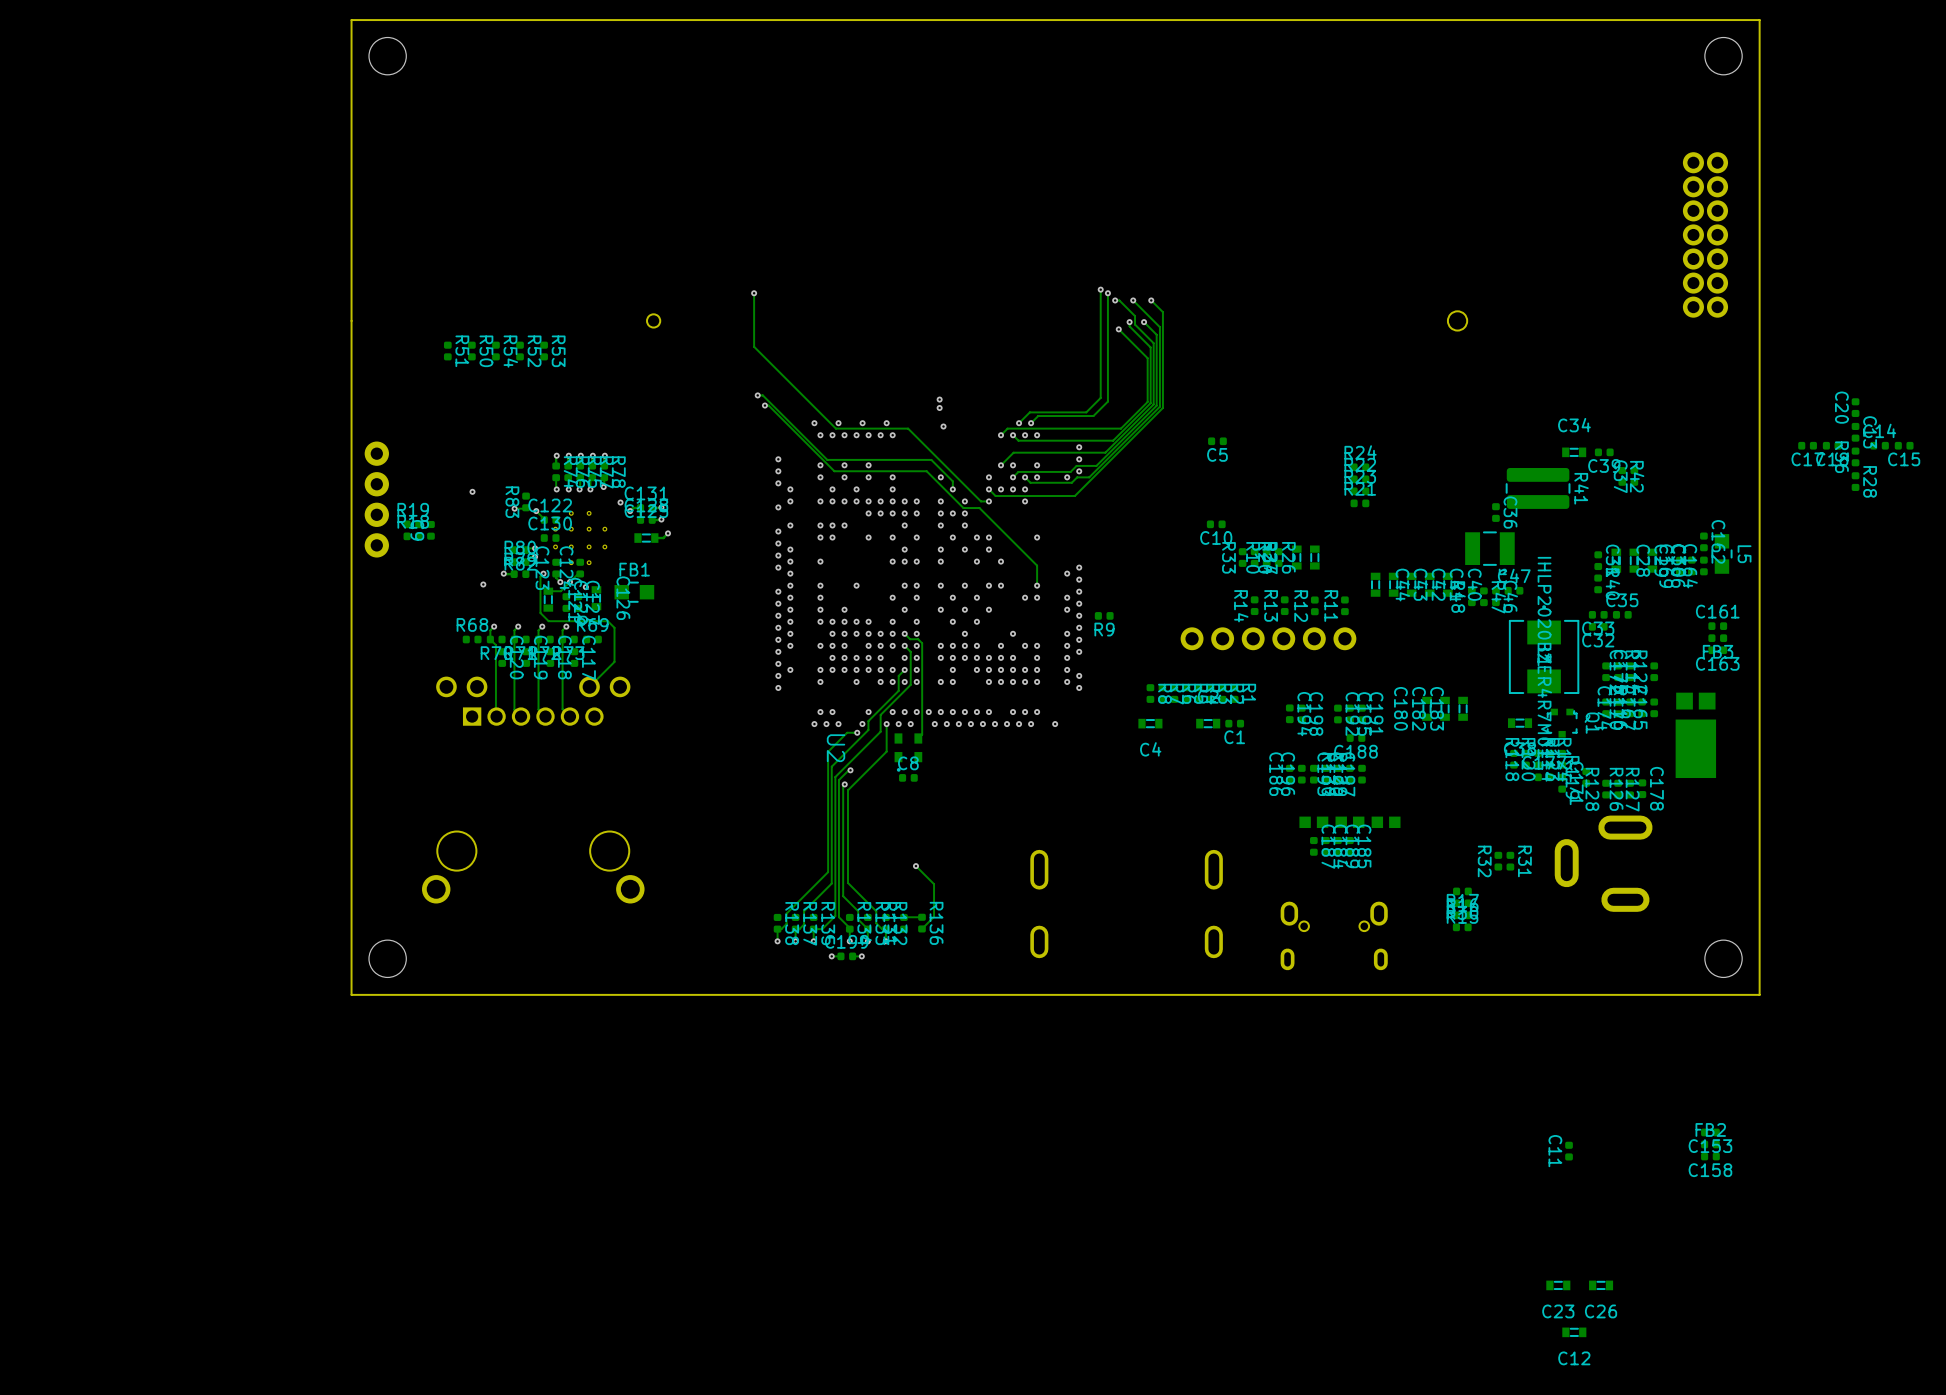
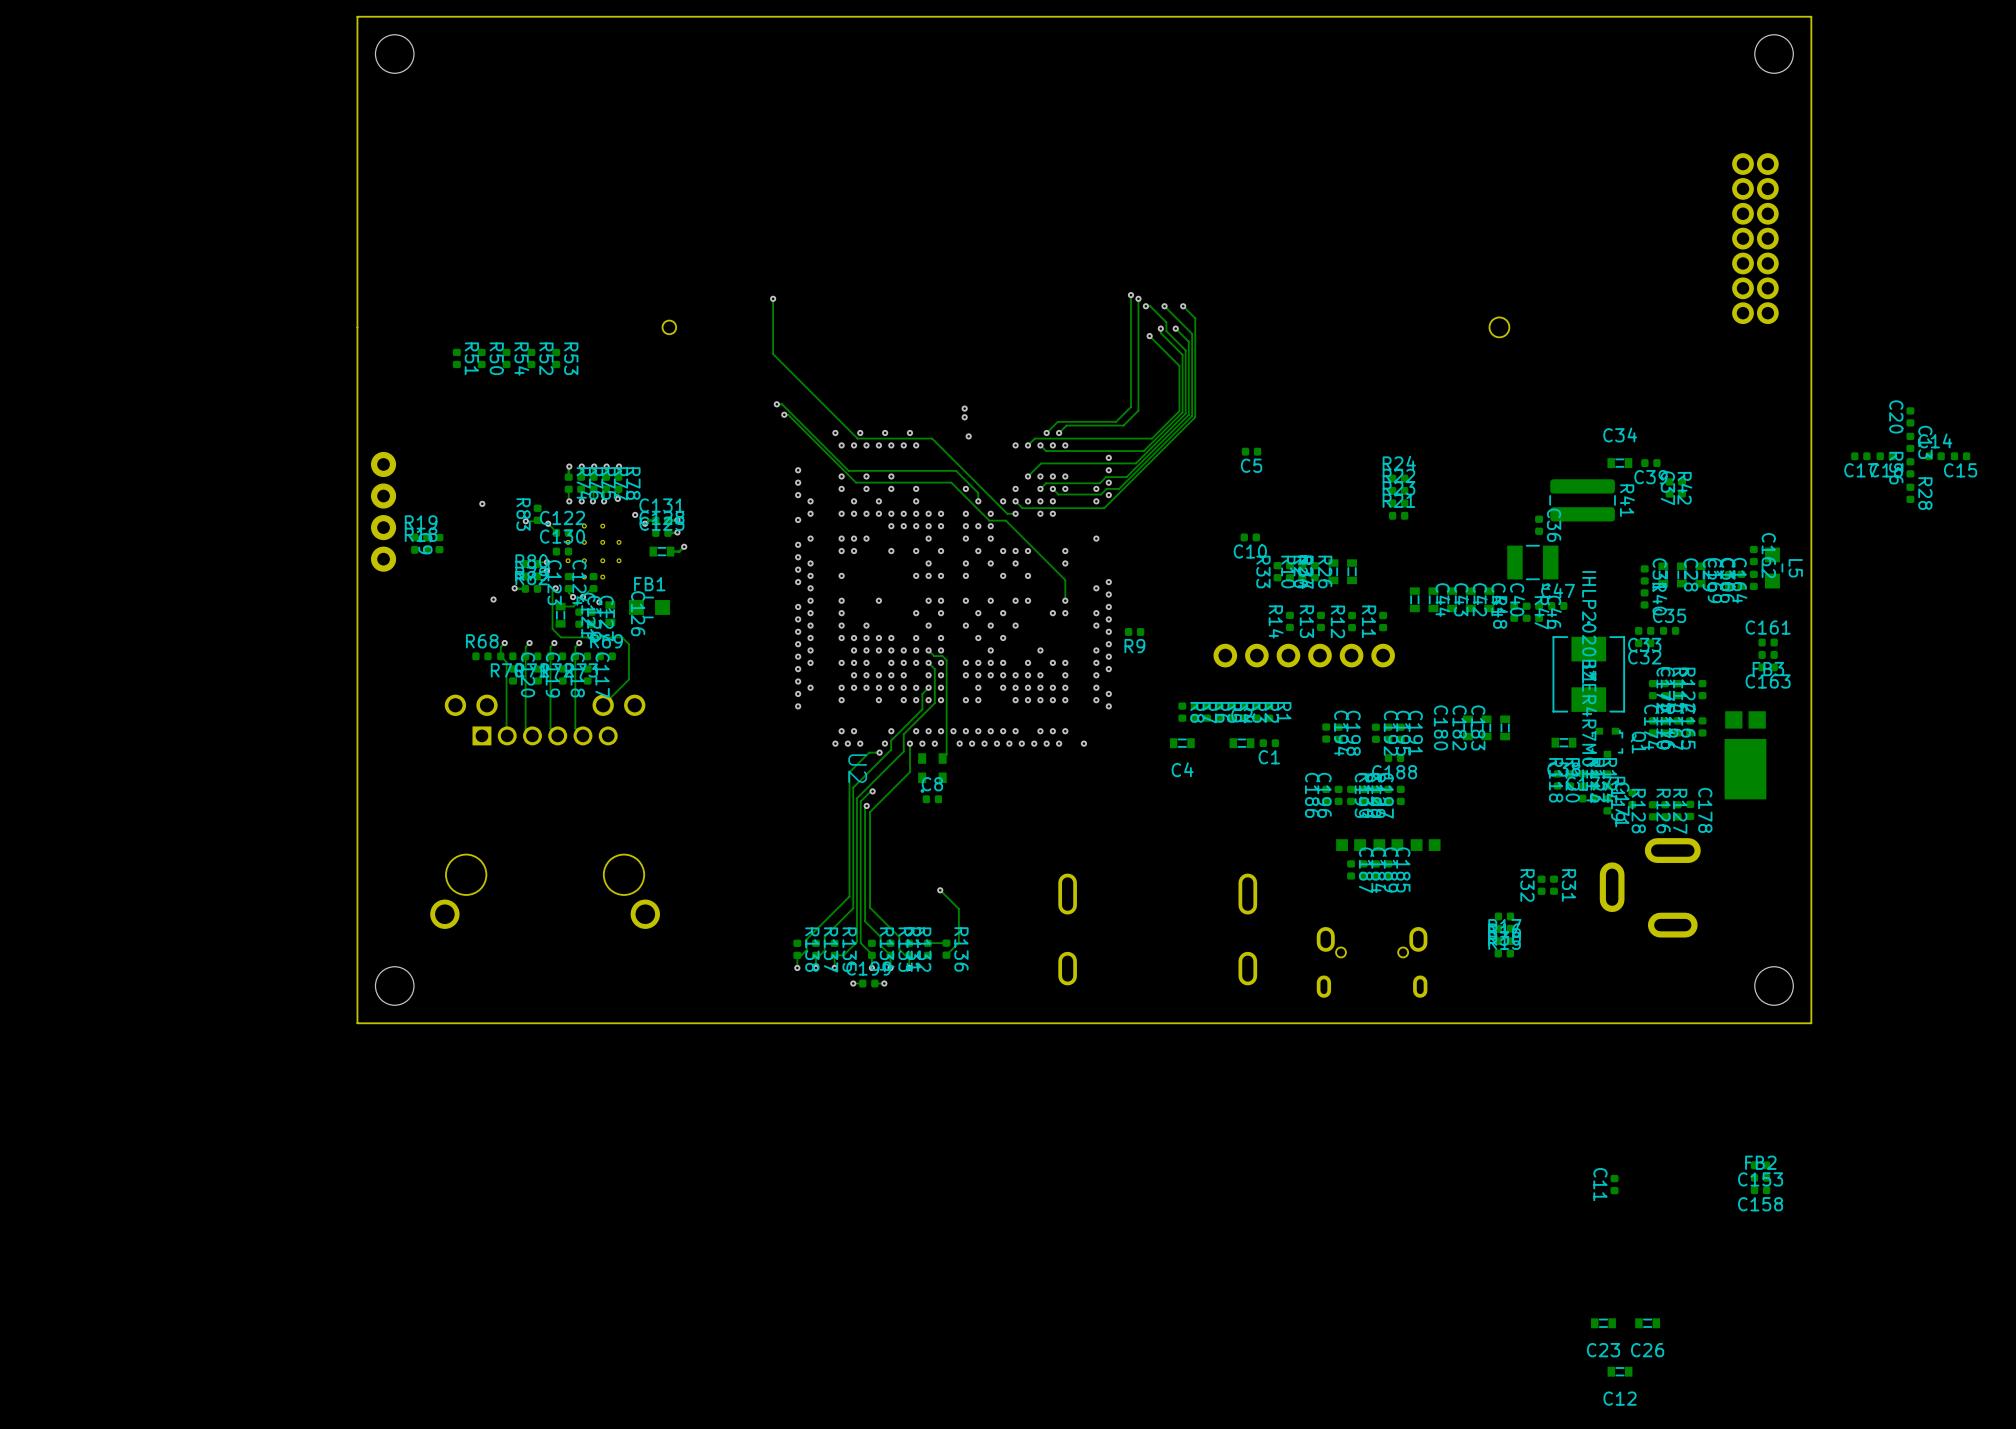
via: none -> (1015, 445)
via: none -> (1052, 476)
via: none -> (1108, 495)
via: none -> (1003, 501)
via: none -> (1096, 501)
via: none -> (1040, 513)
via: none -> (1096, 538)
via: none -> (1028, 551)
via: none -> (1065, 563)

